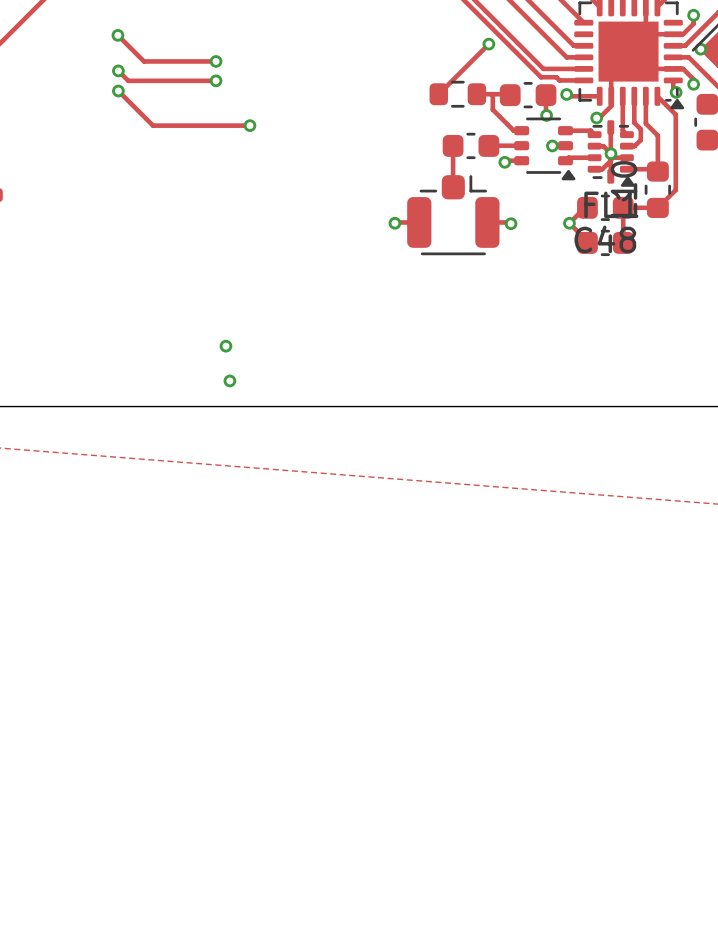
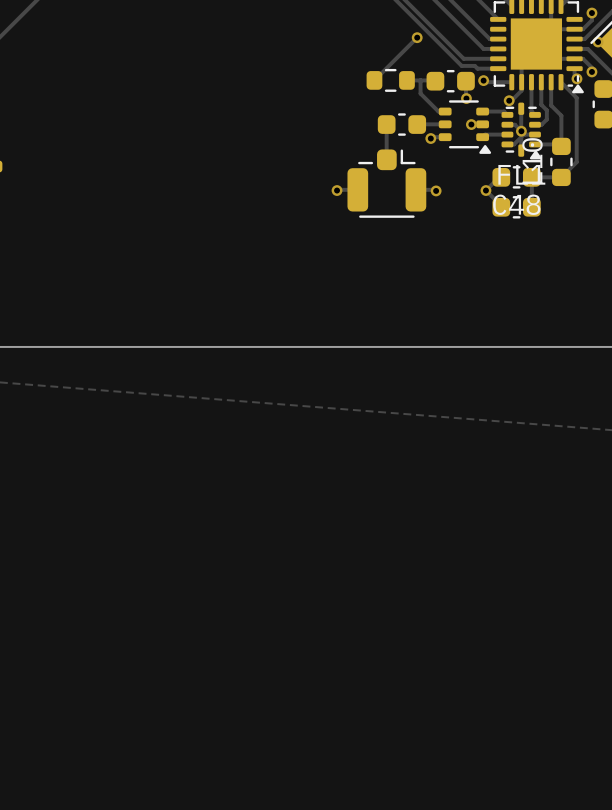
track: (117, 35) (144, 61) (216, 61) -> none
via: (117, 35) -> none
via: (216, 61) -> none
track: (118, 70) (128, 80) (216, 80) -> none
via: (118, 70) -> none
via: (216, 80) -> none
track: (118, 90) (153, 125) (249, 125) -> none
via: (118, 90) -> none
via: (249, 125) -> none
via: (225, 346) -> none
via: (229, 380) -> none

